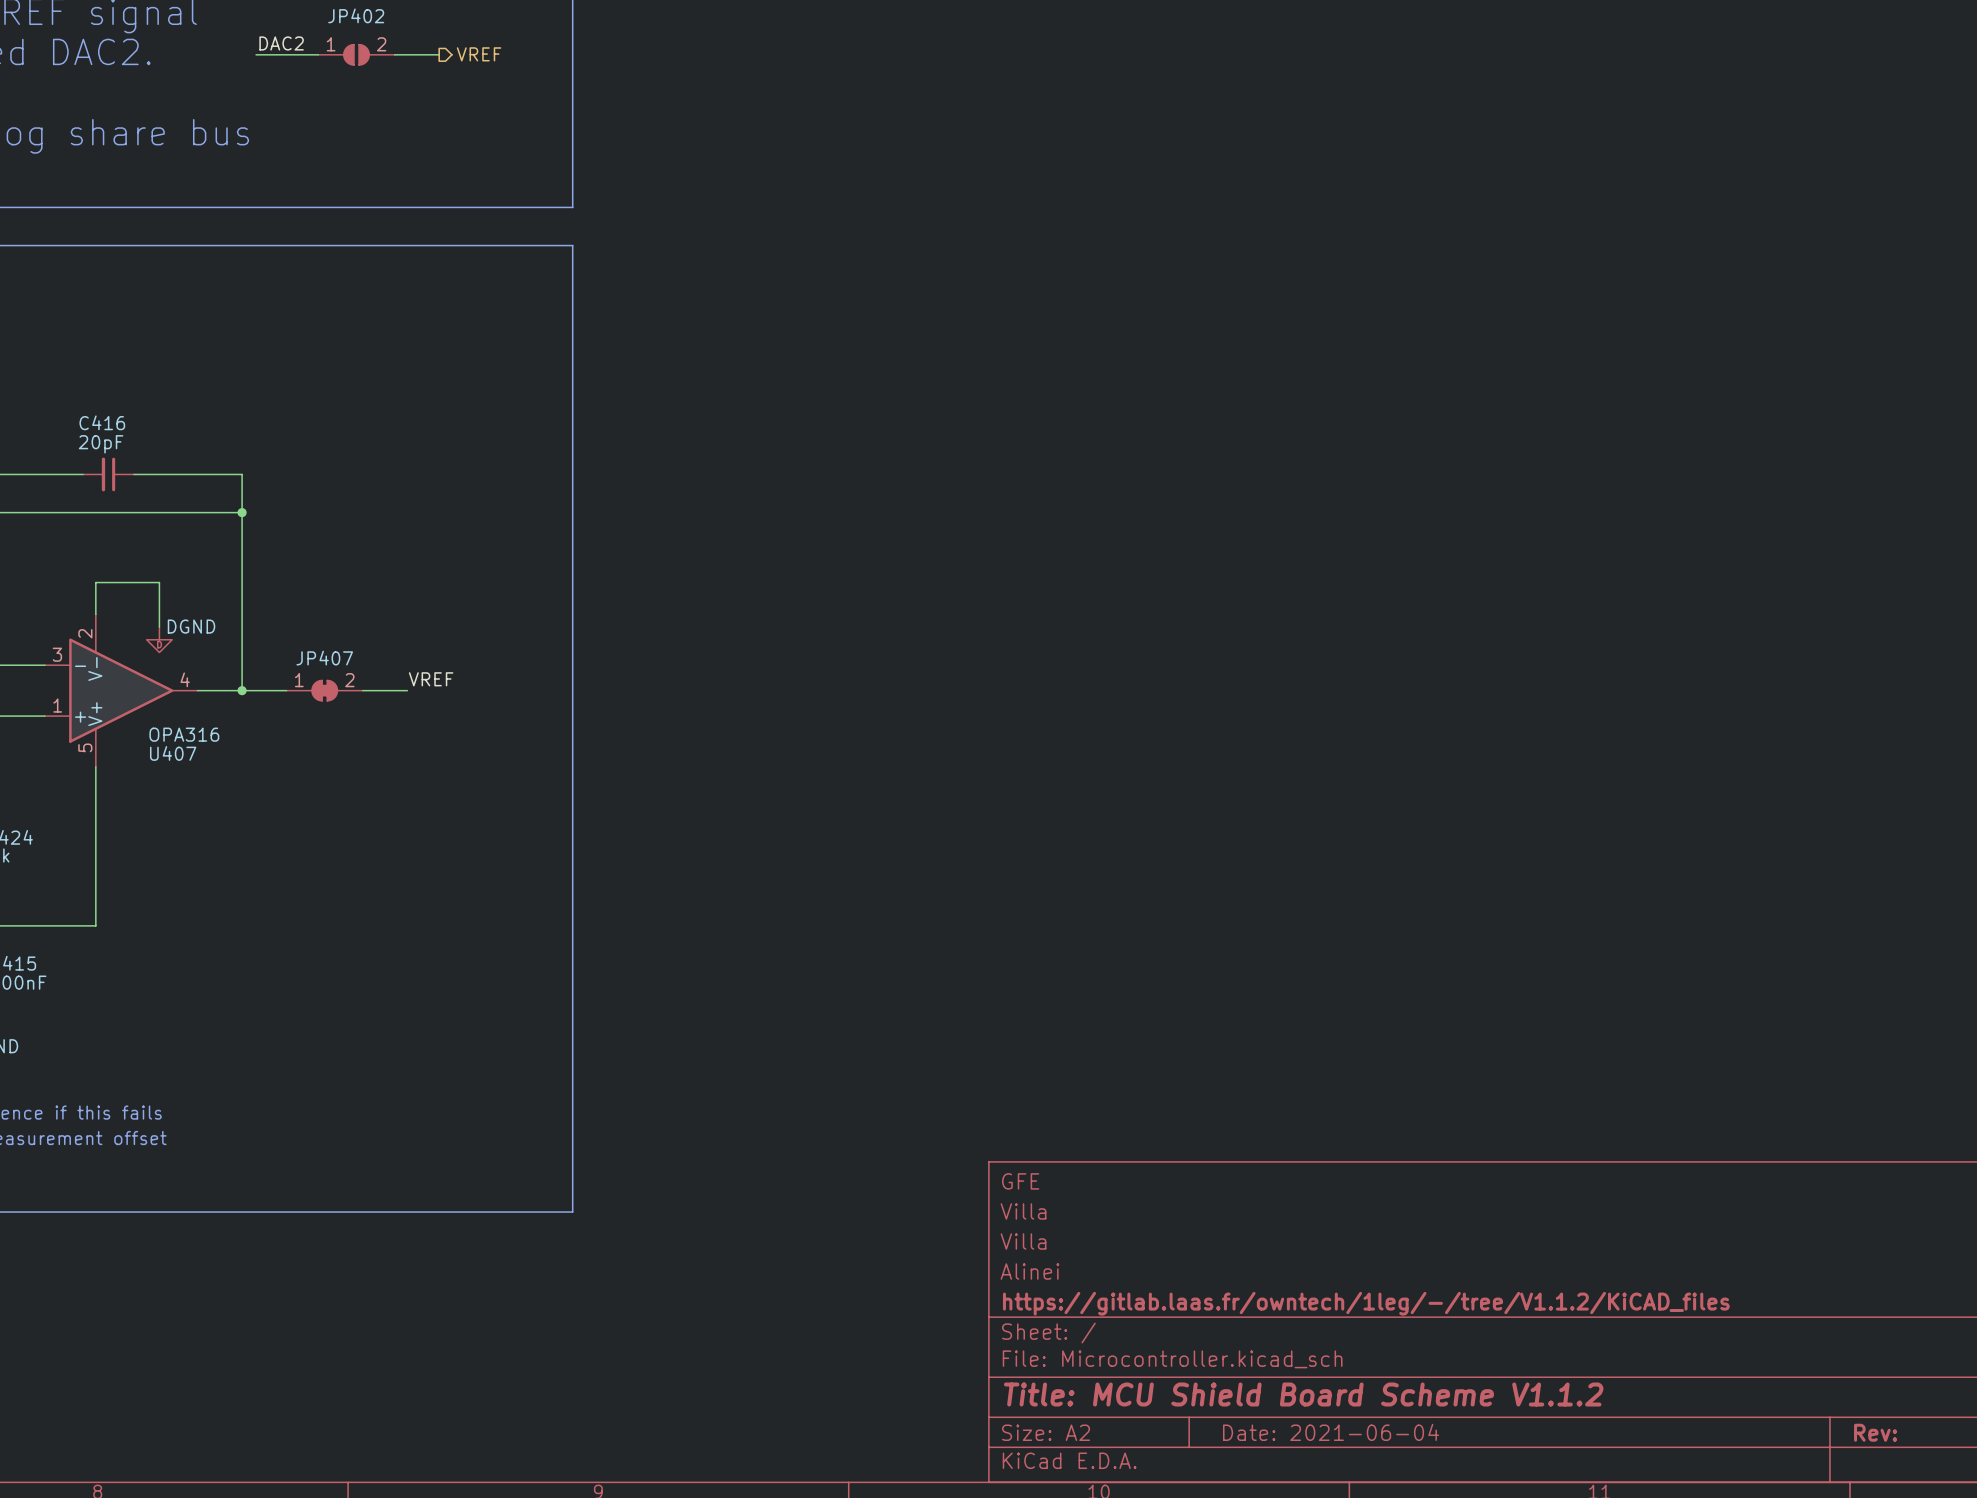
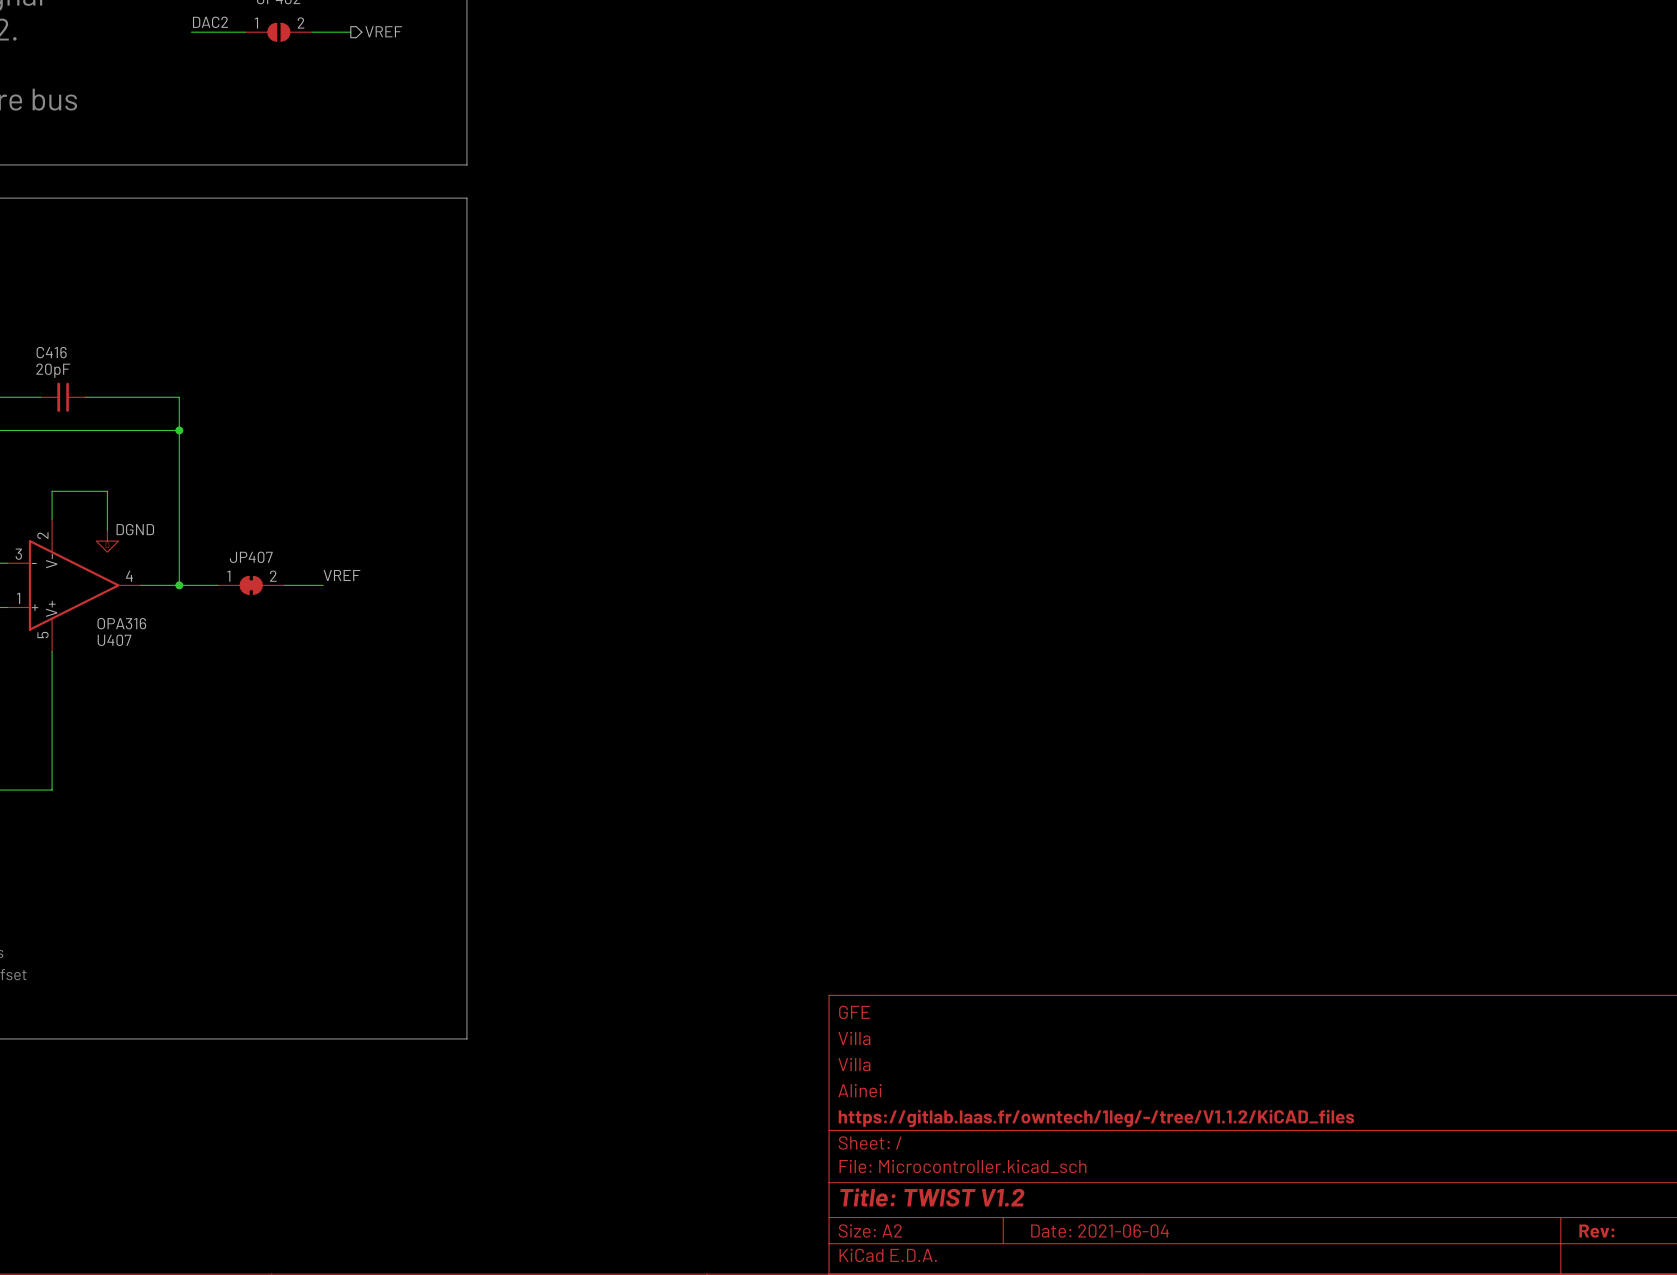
title block: Title: MCU Shield Board Scheme V1.1.2 (1303, 1394) -> Title: TWIST V1.2 (932, 1197)

